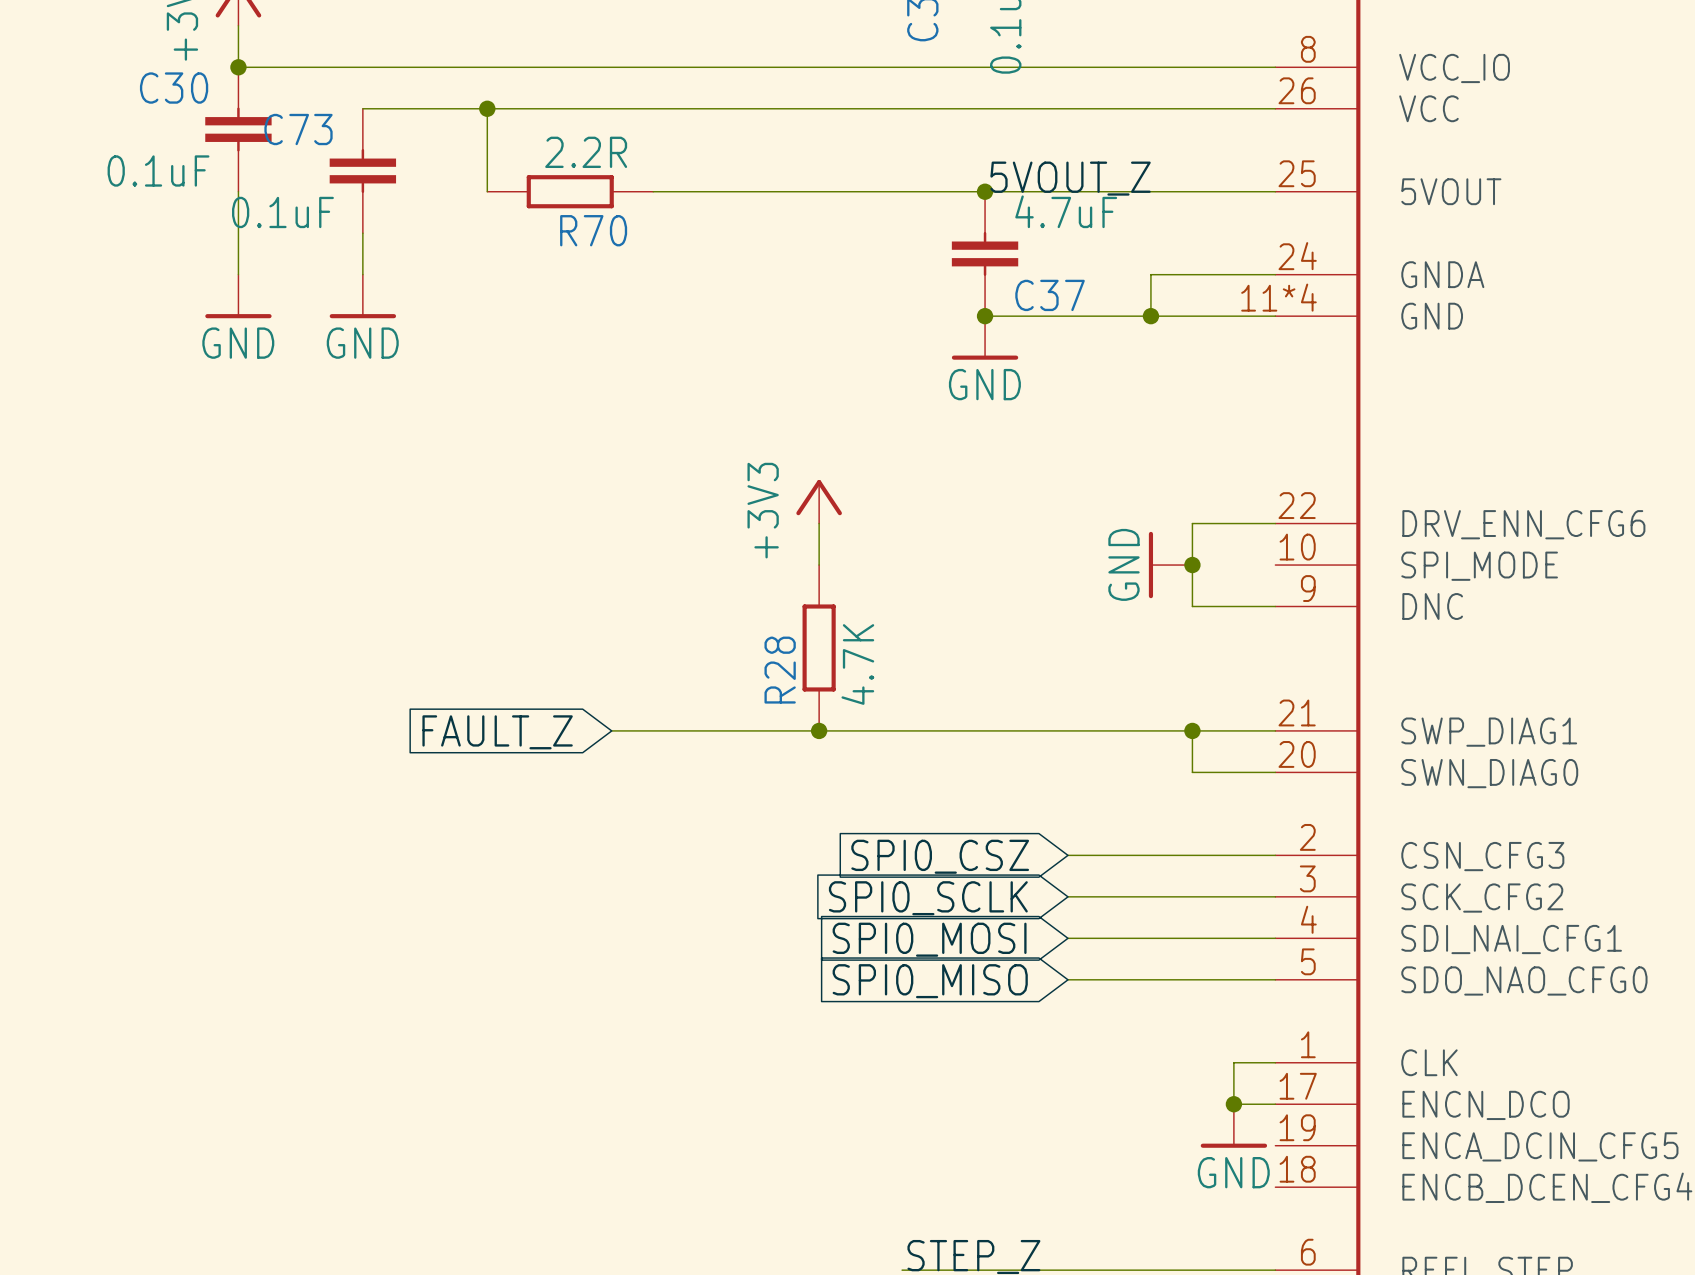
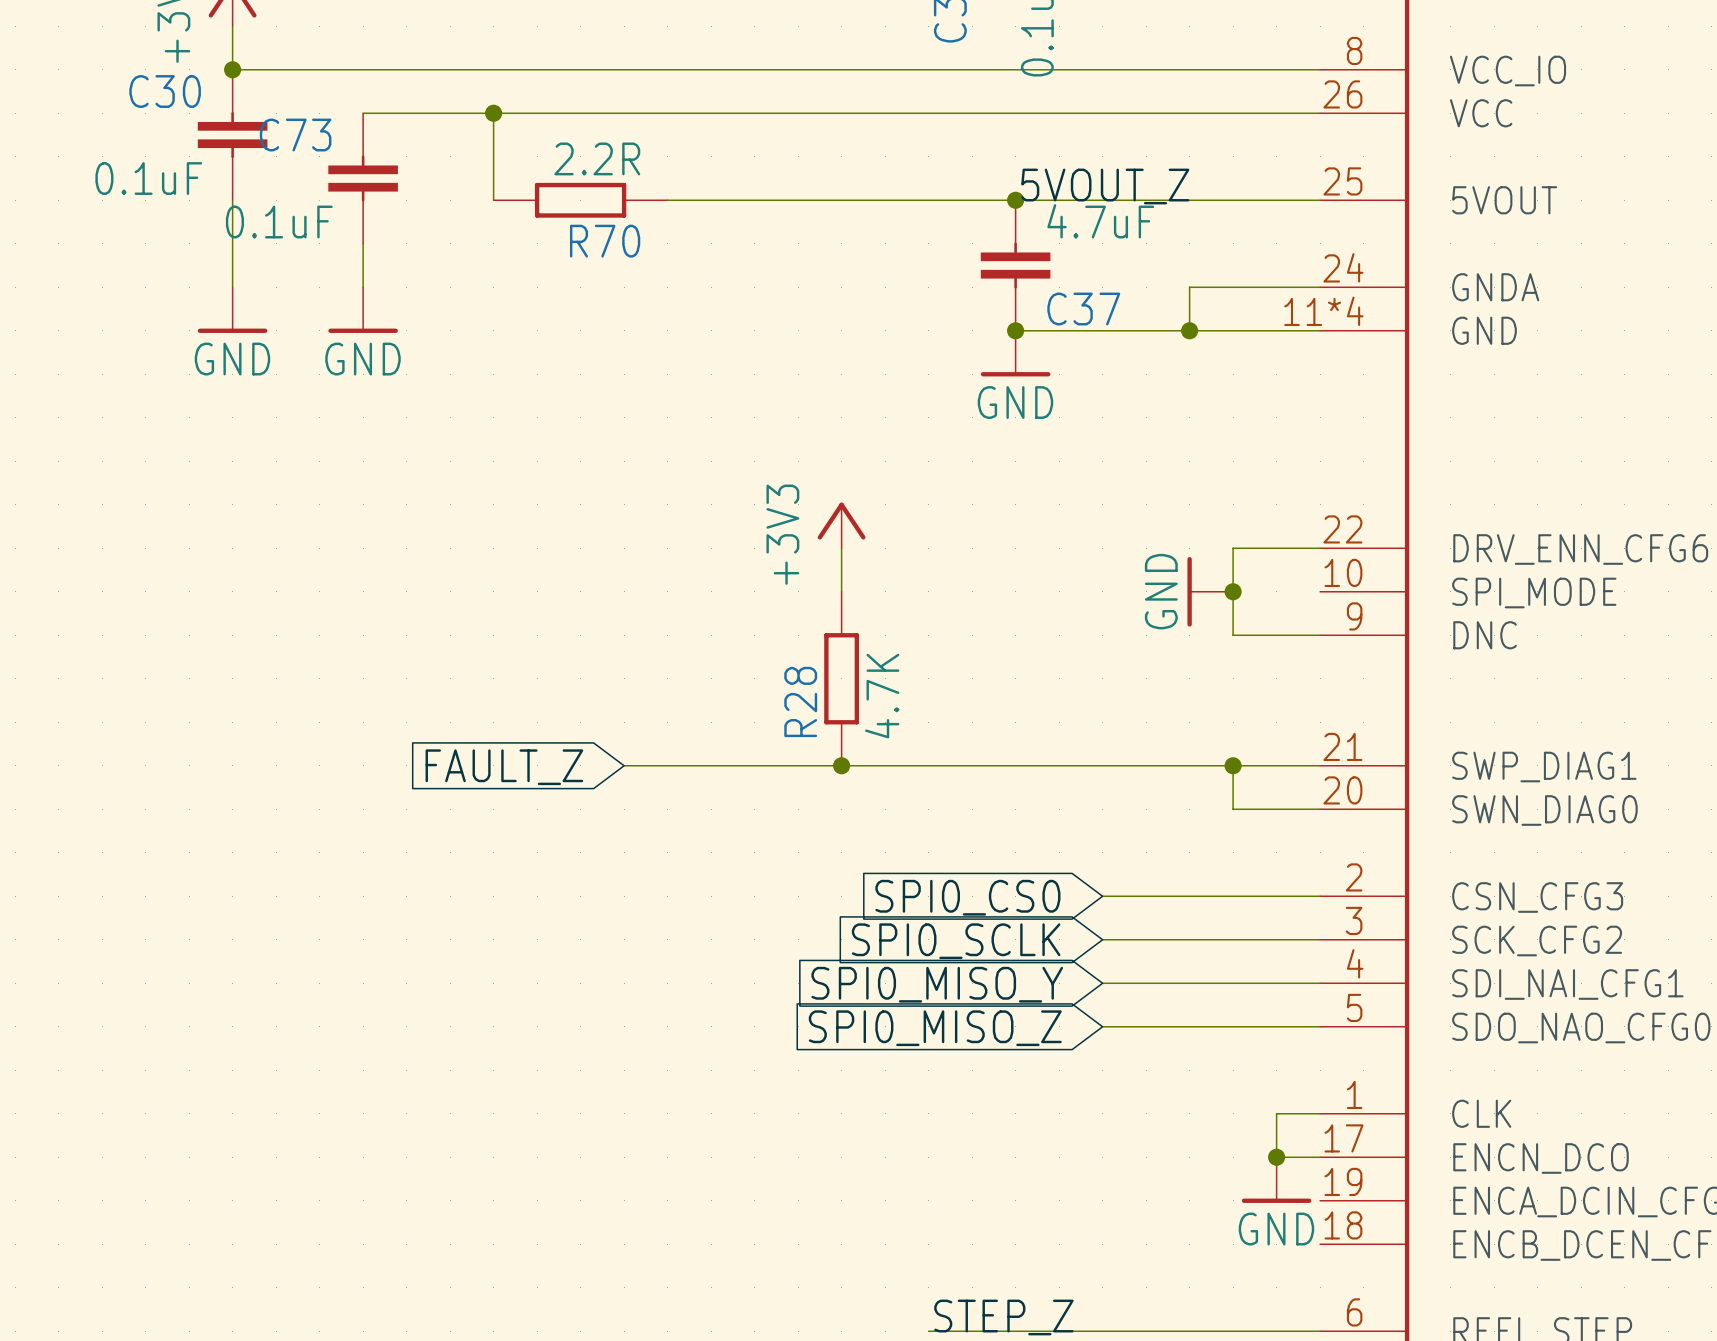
global label: SPI0_CSZ (940, 856) -> SPI0_CS0 (967, 897)
global label: SPI0_MOSI (929, 939) -> SPI0_MISO_Y (937, 984)
global label: SPI0_MISO (930, 981) -> SPI0_MISO_Z (935, 1028)

